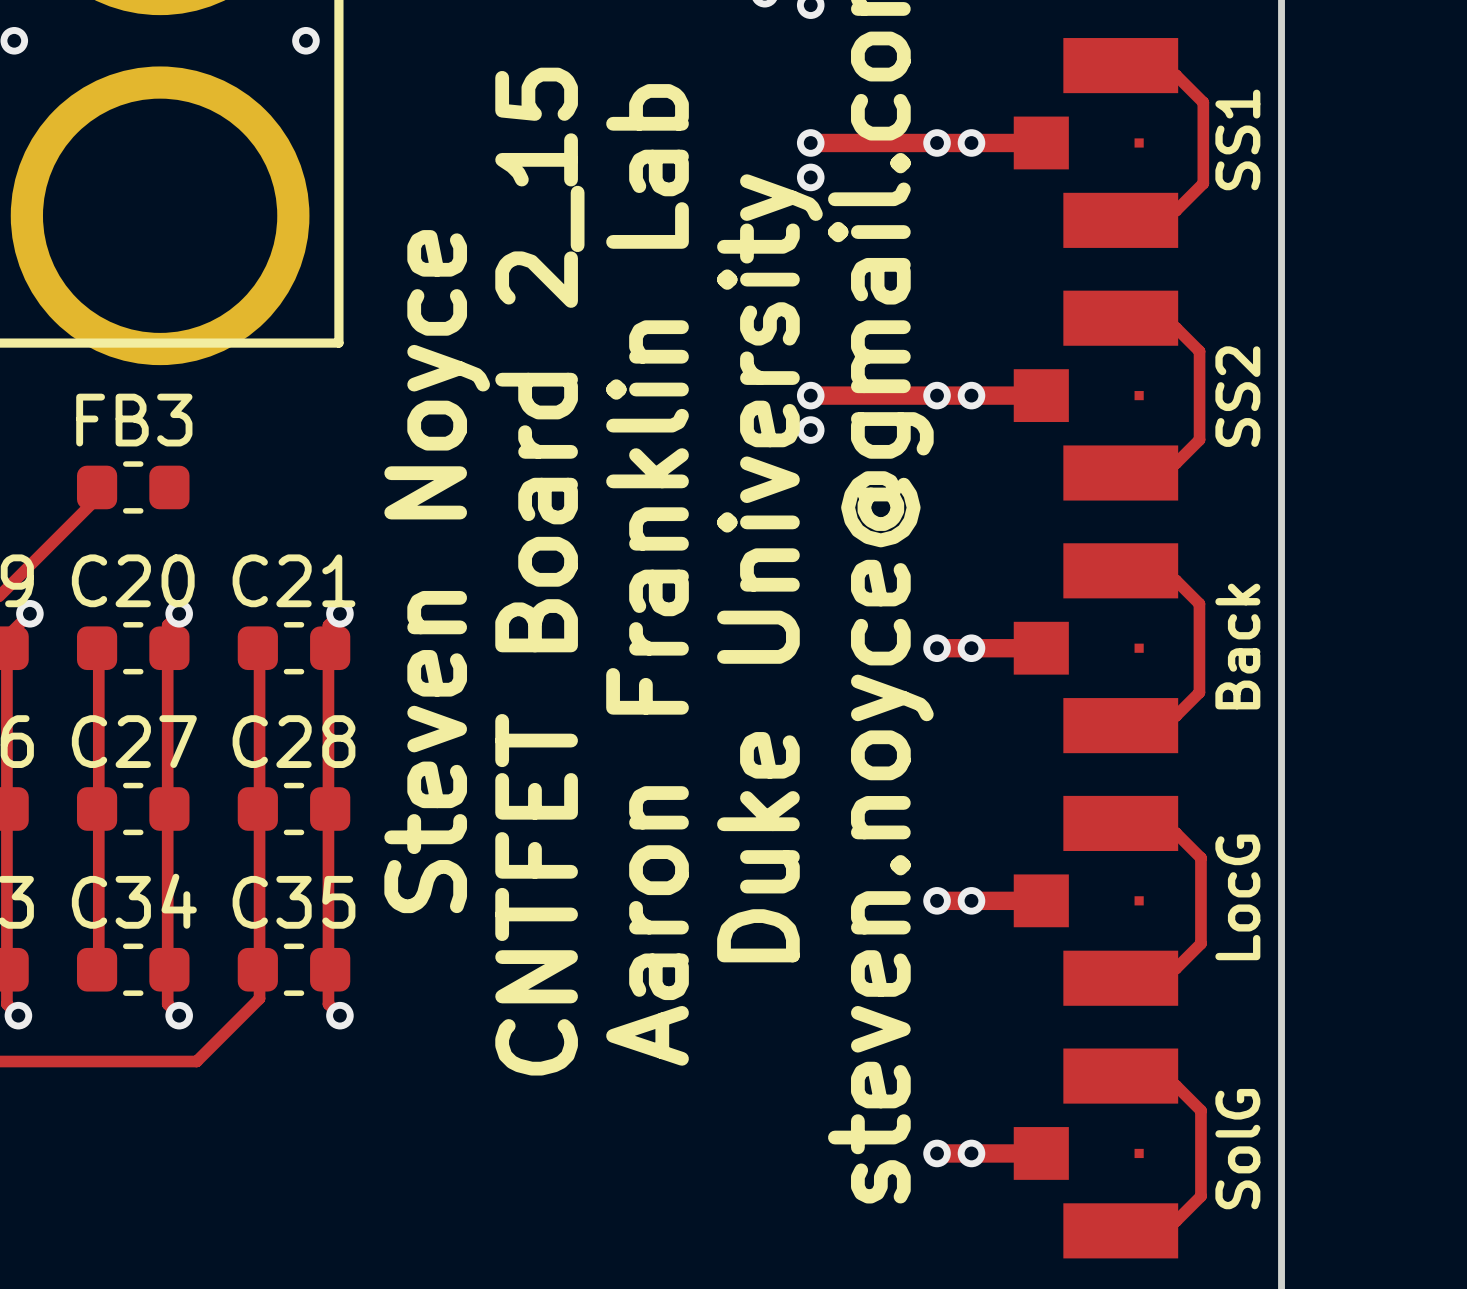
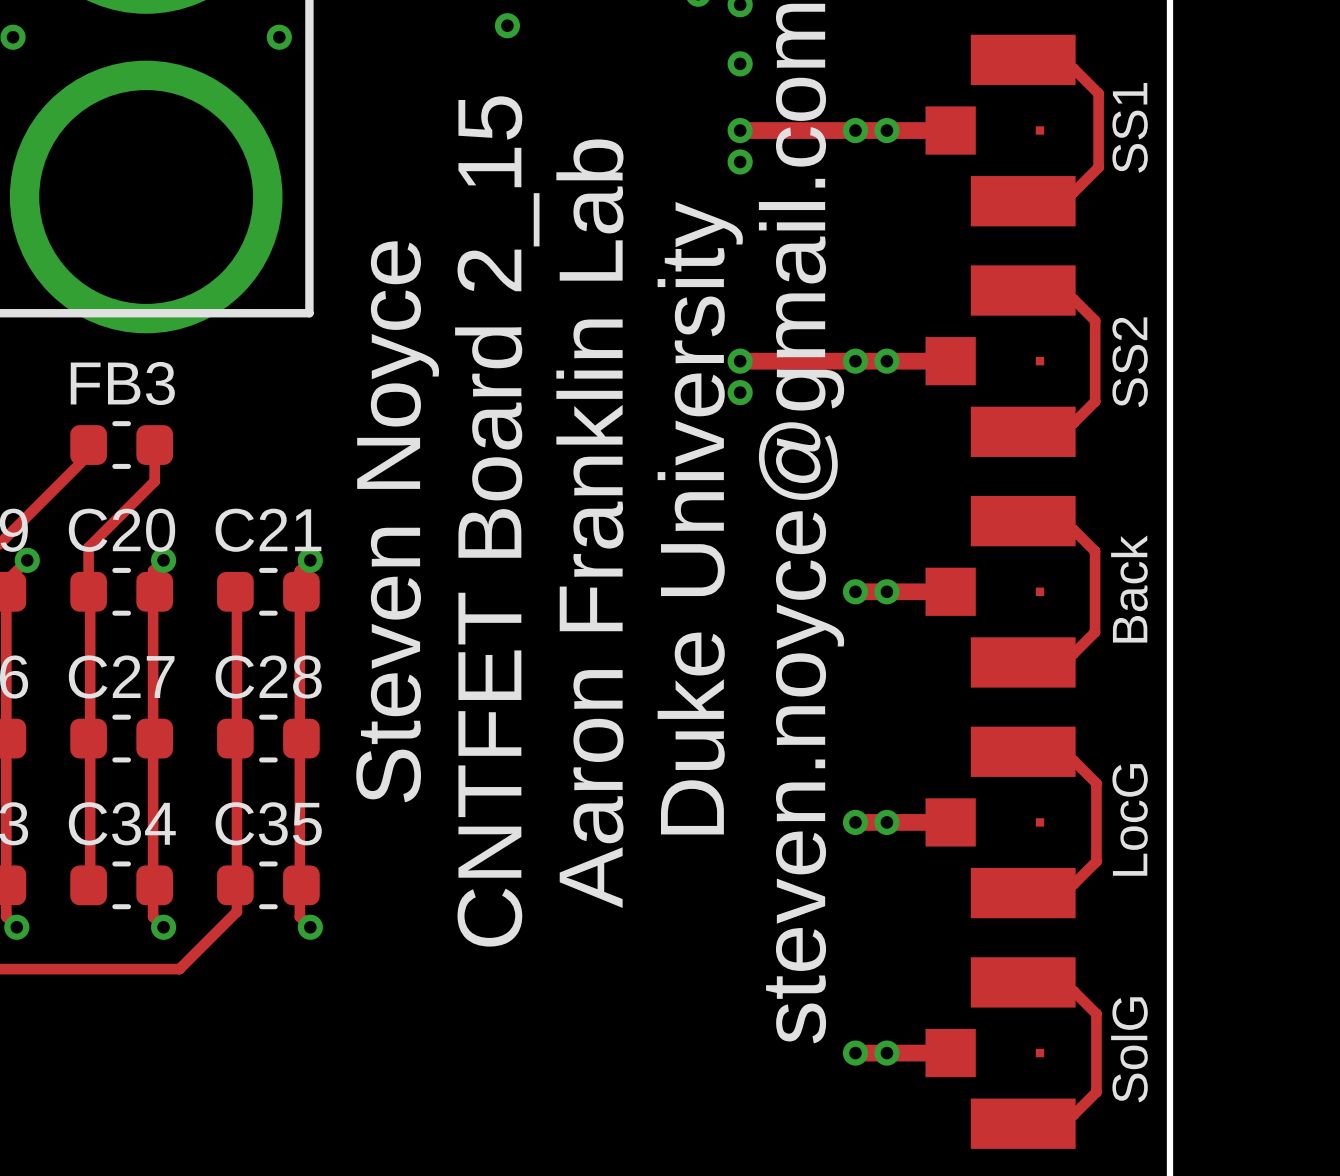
via: none -> (507, 25)
via: none -> (740, 63)
track: none -> (154, 445) (154, 481) (88, 547) (88, 591)

